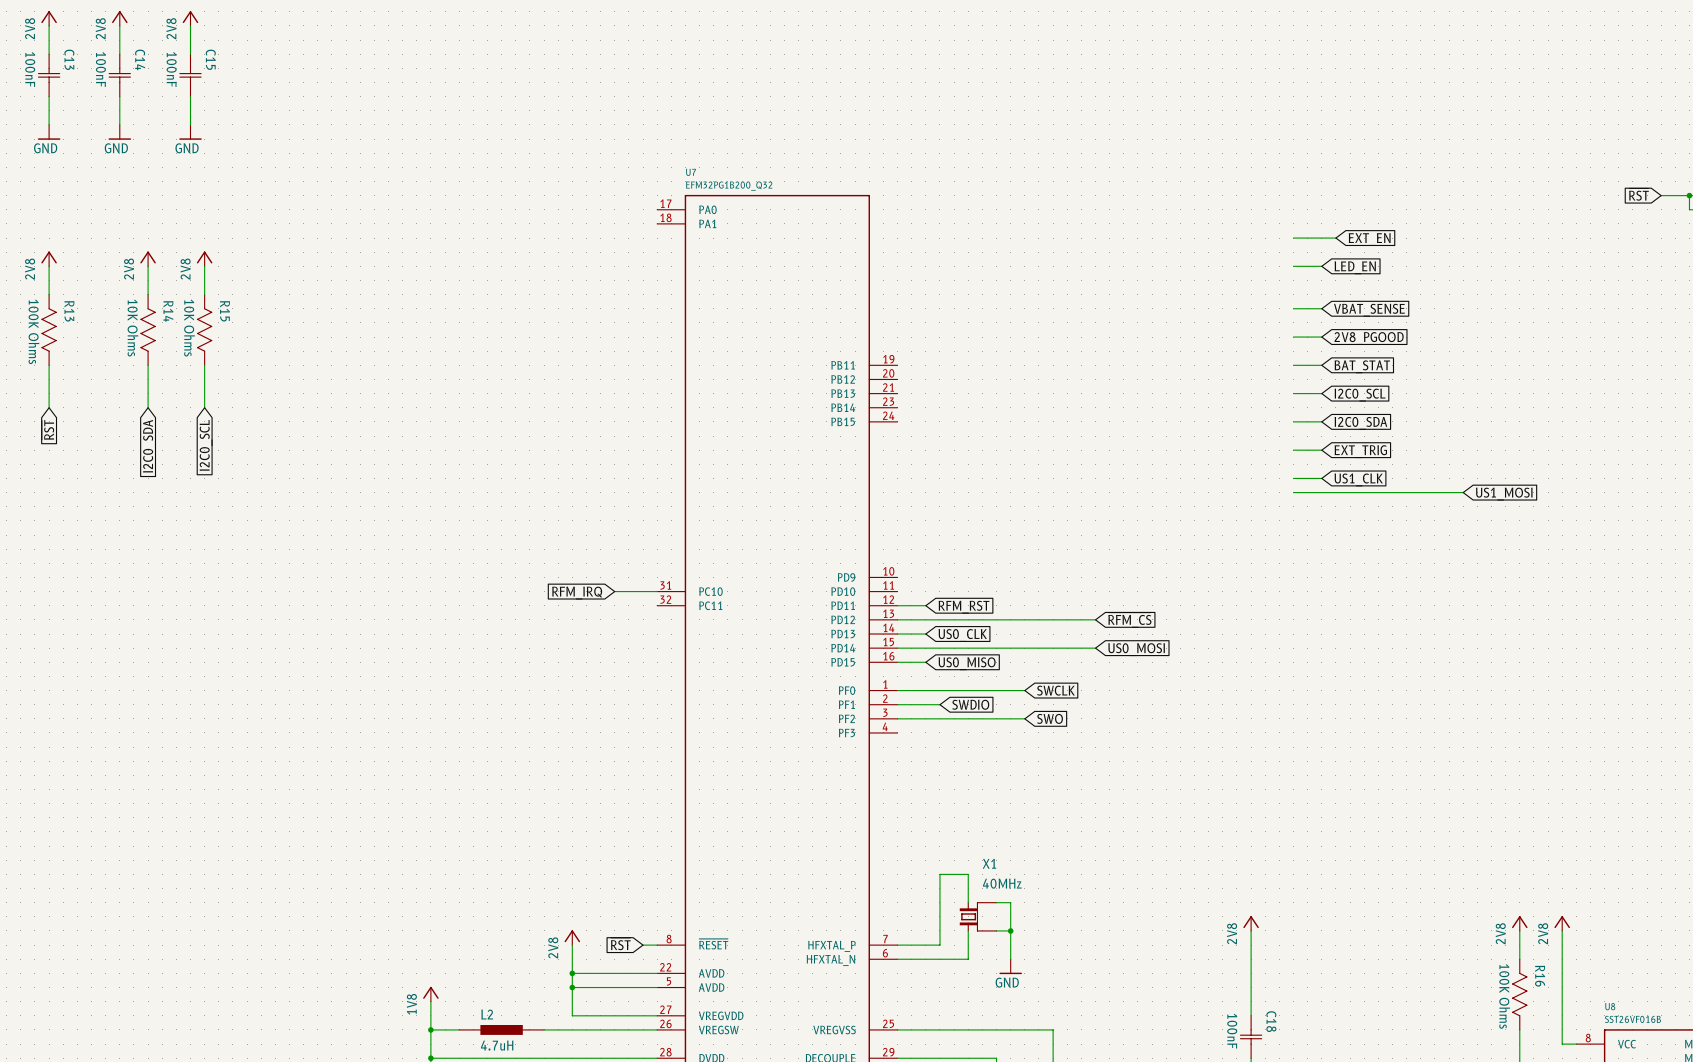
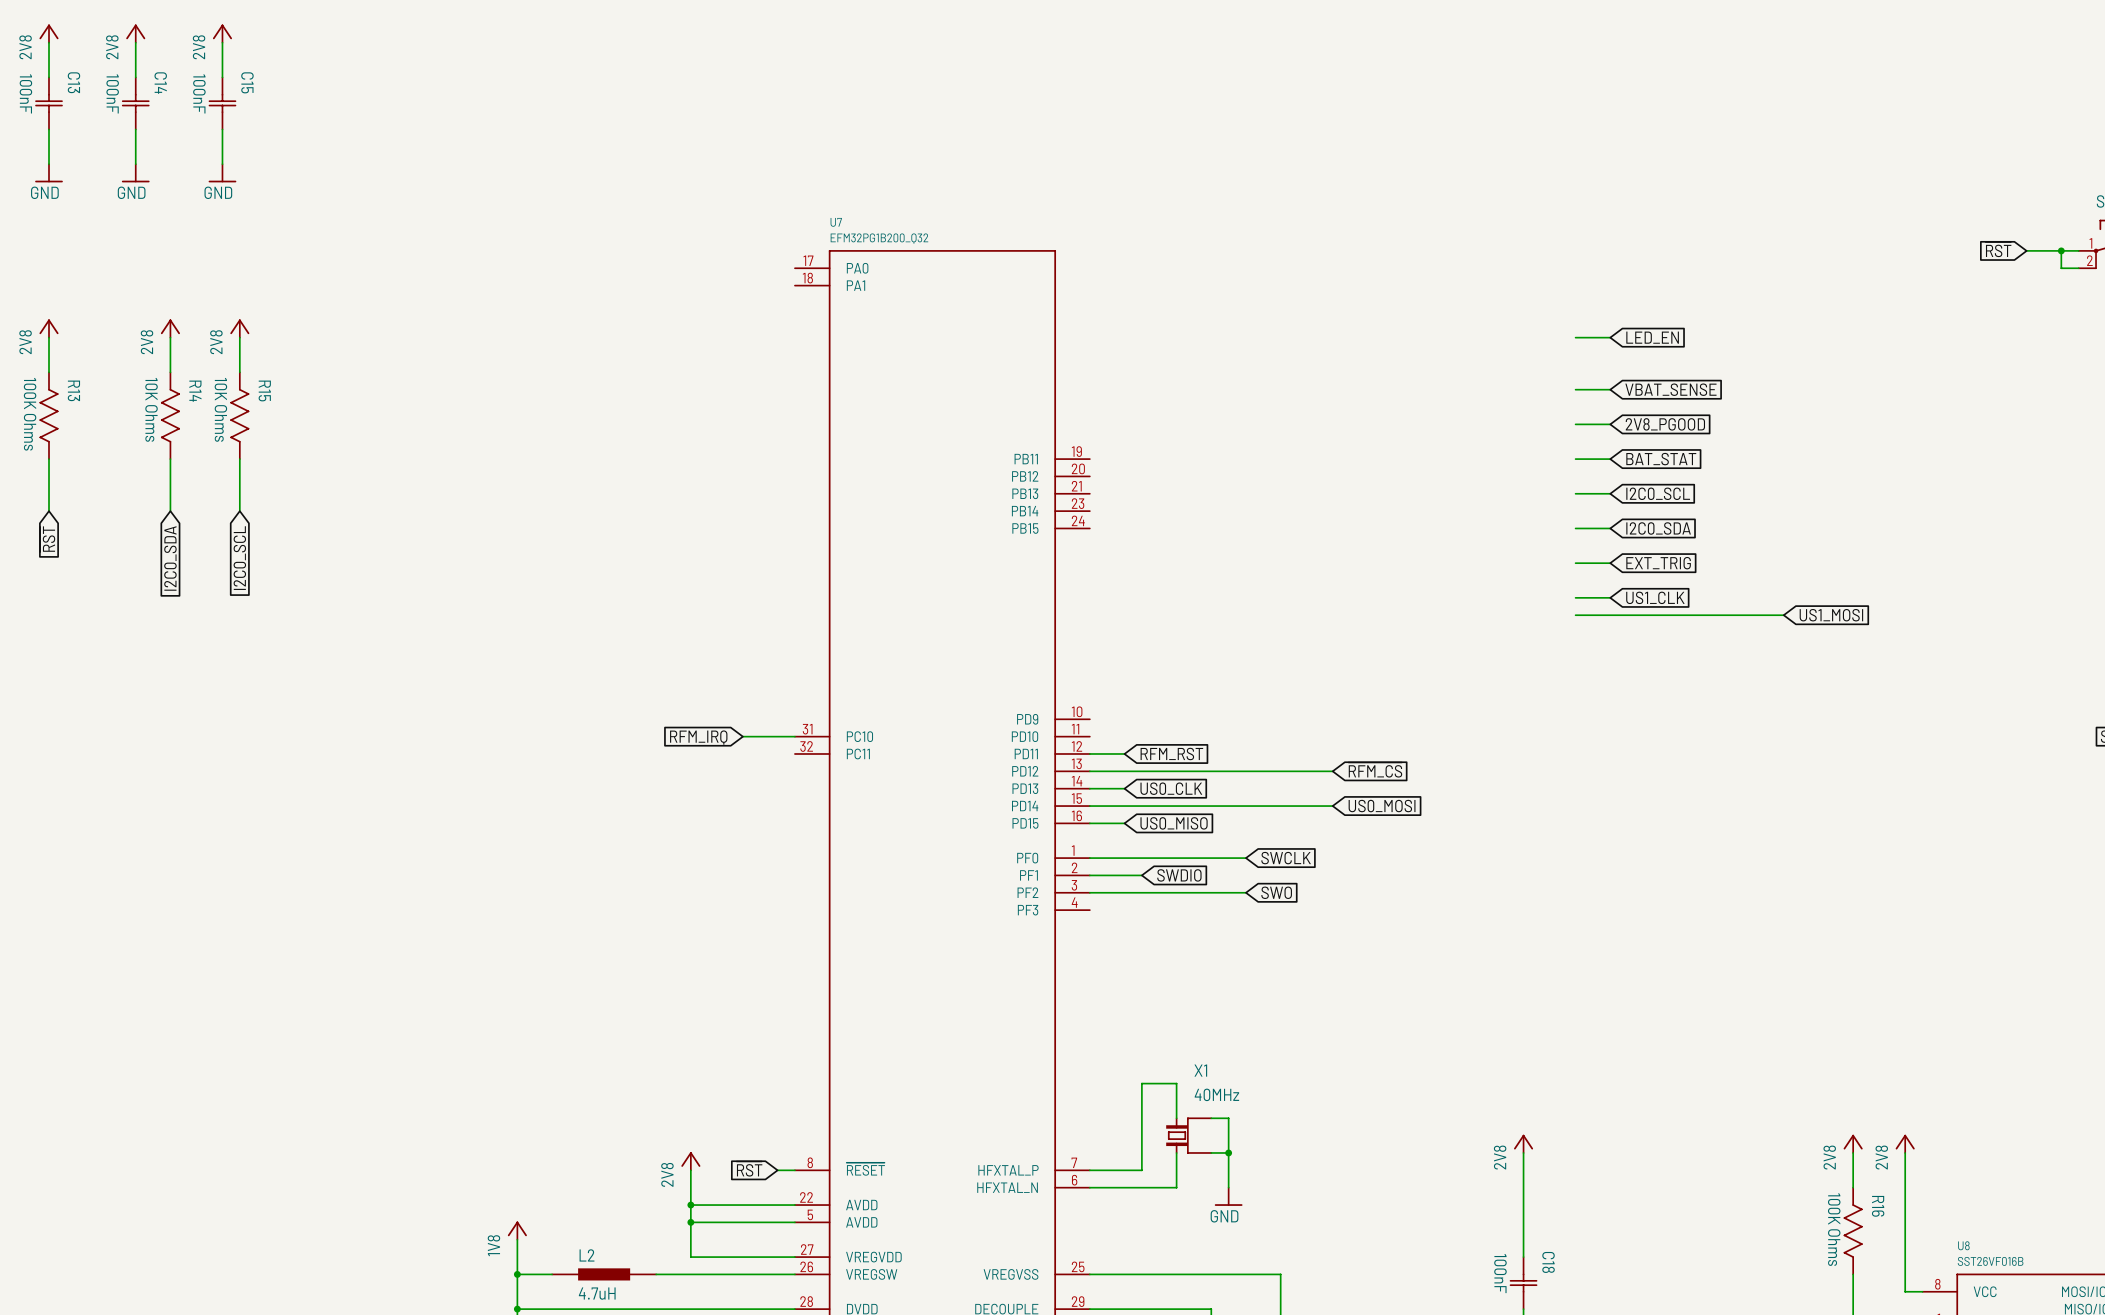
wire: (1293, 238) (1335, 238) -> none
global label: EXT_EN (1369, 239) -> none

